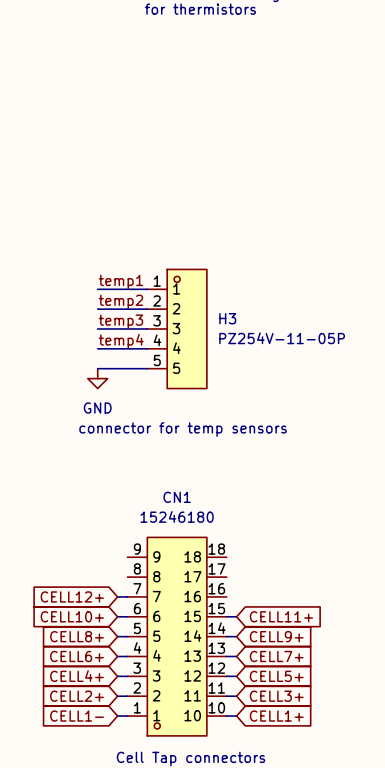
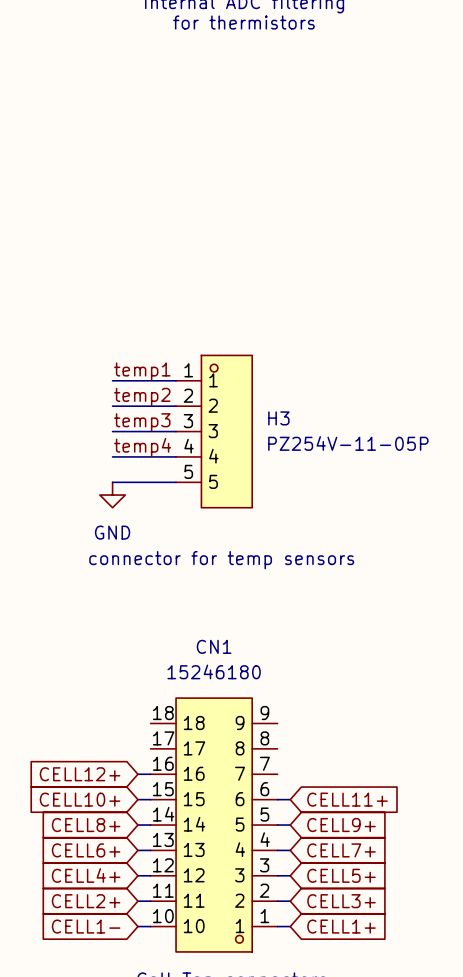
CN1 flip: as is (177, 636) -> left-right (214, 825)

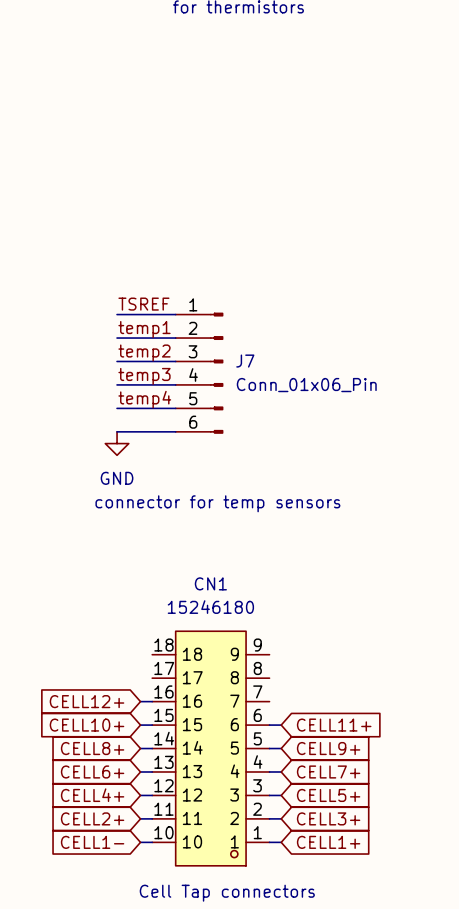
label: none -> TSREF (143, 304)
wire: none -> (117, 314) (175, 314)
J7: none -> Conn_01x06_Pin (199, 373)
H3: PZ254V-11-05P (214, 431) -> none

